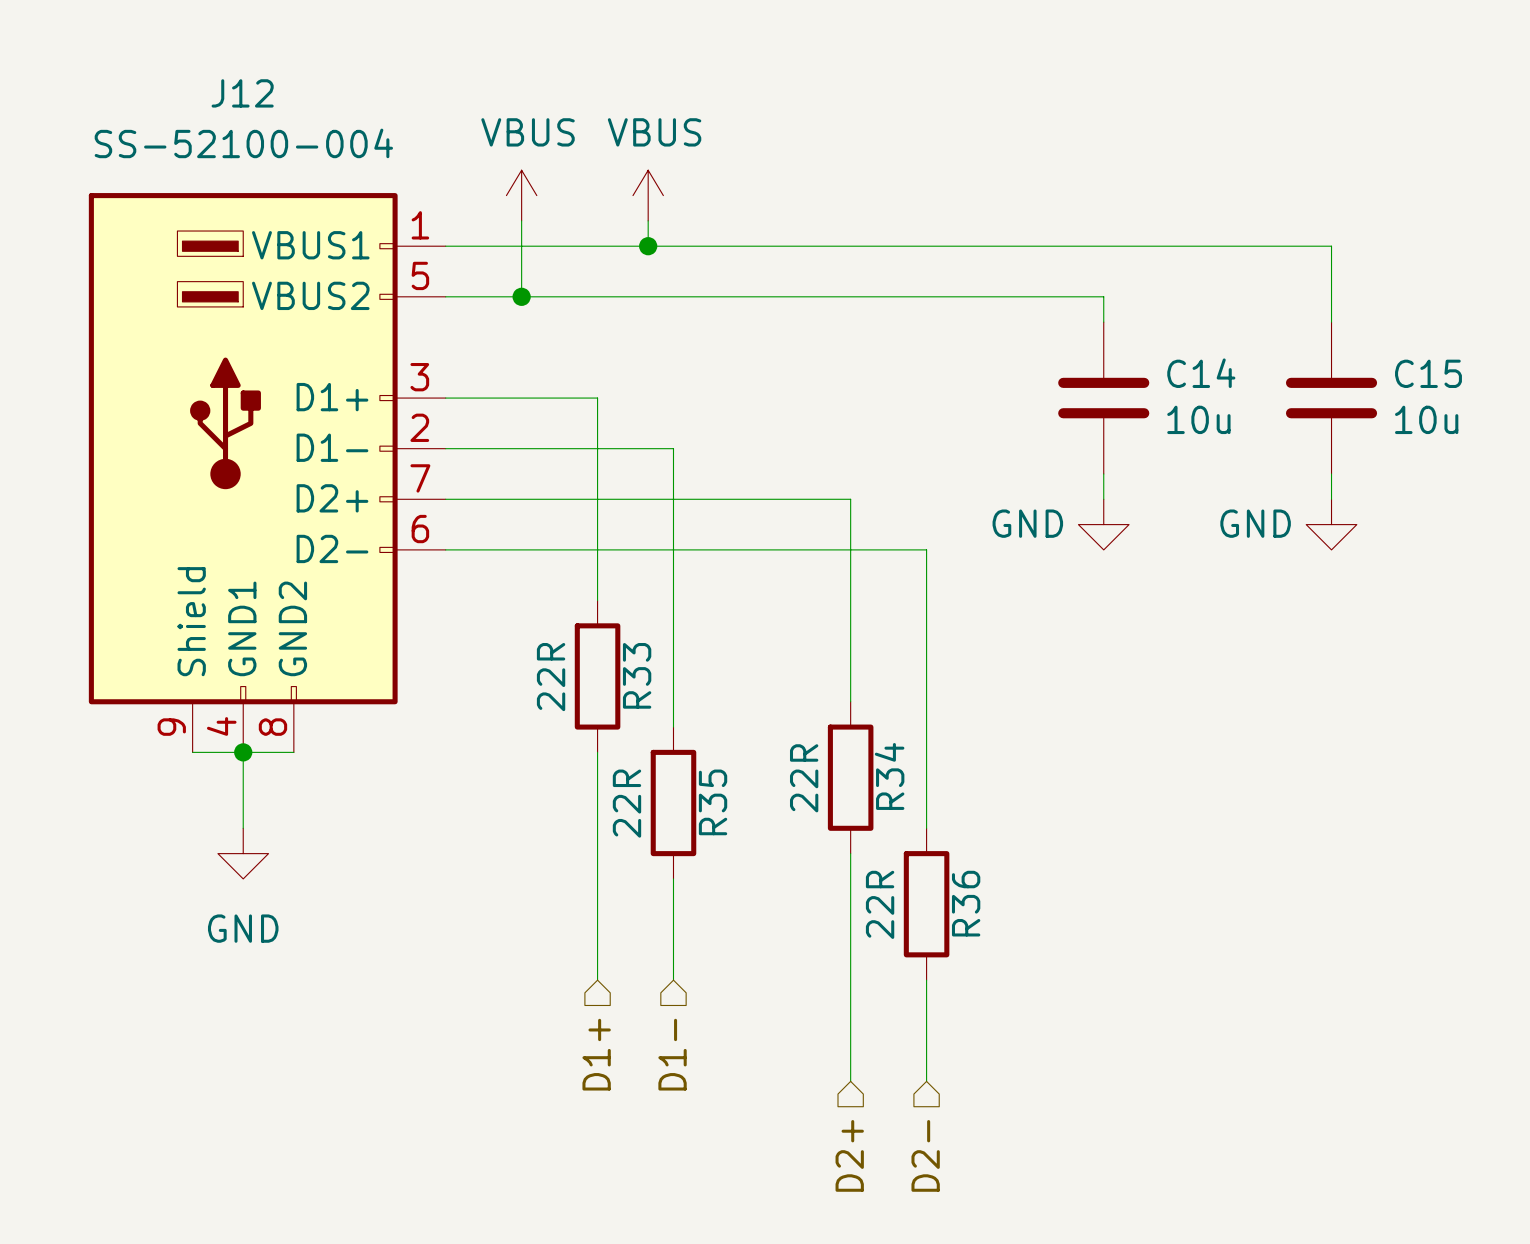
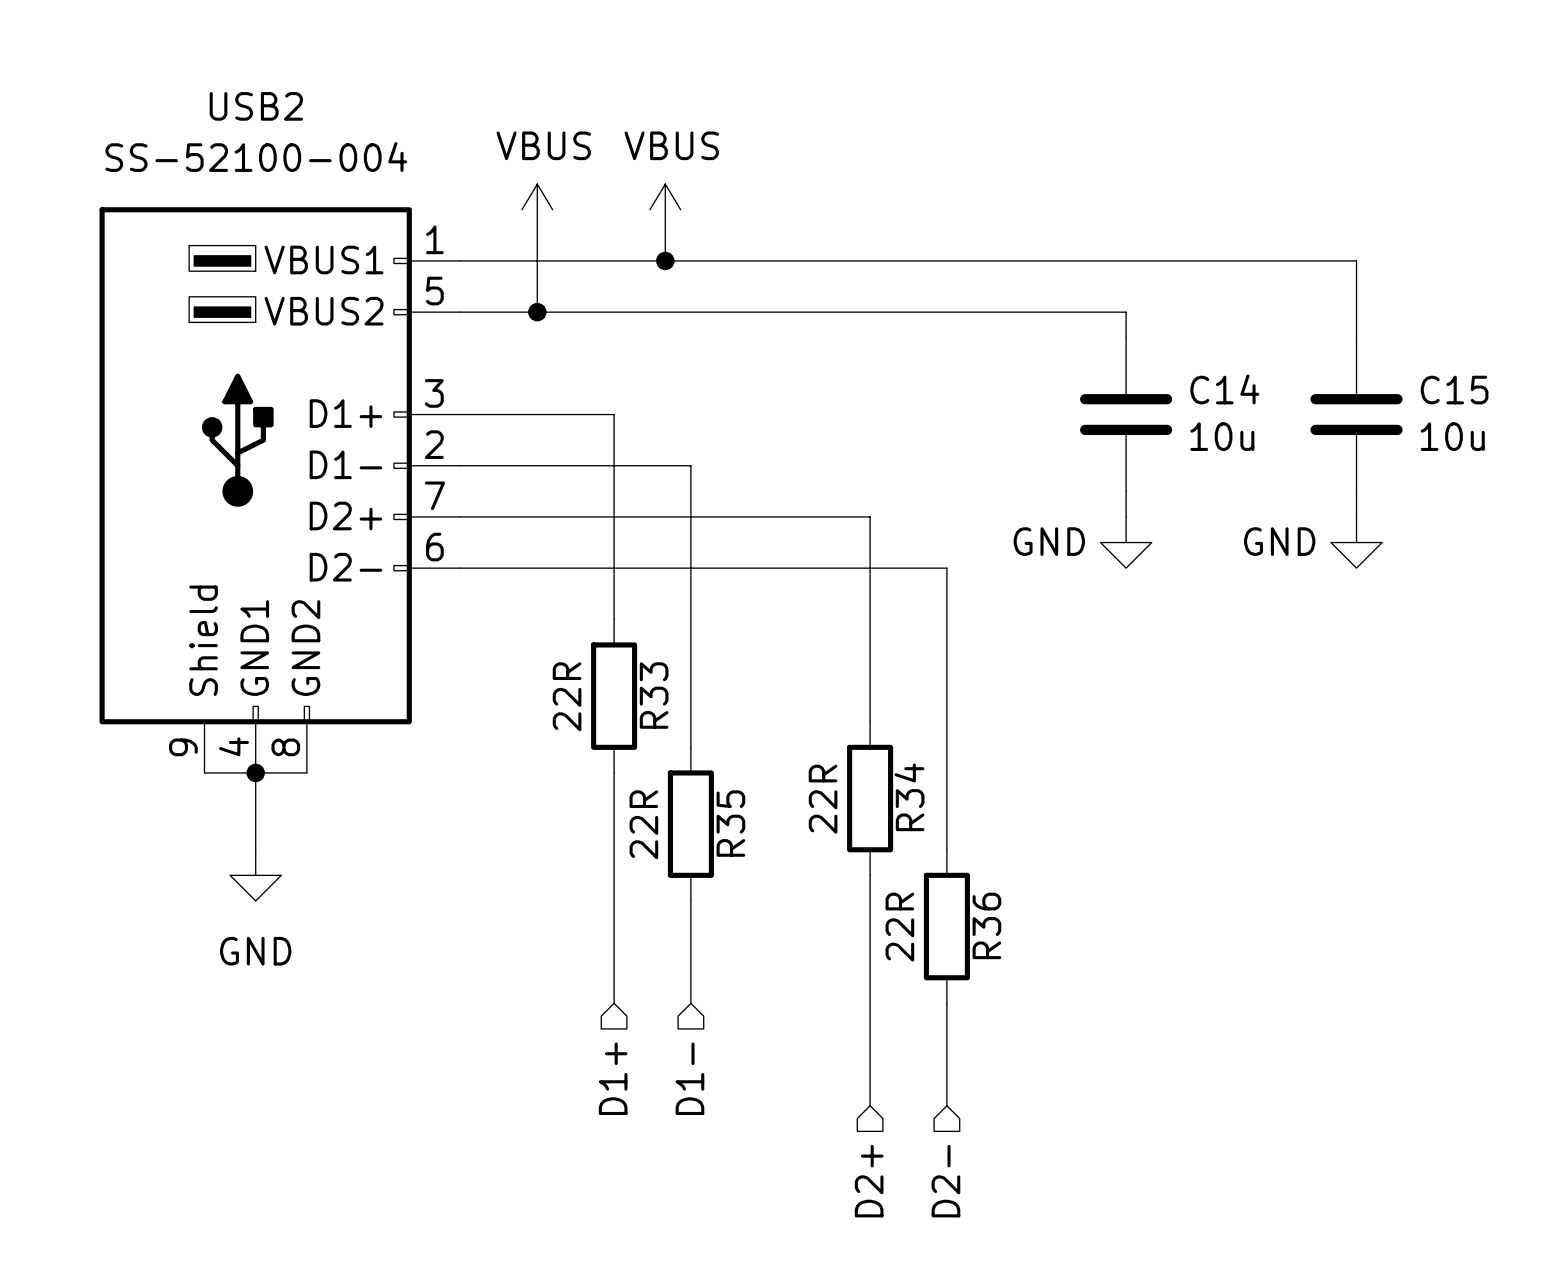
J12 name: J12 (242, 93) -> USB2 (256, 106)

